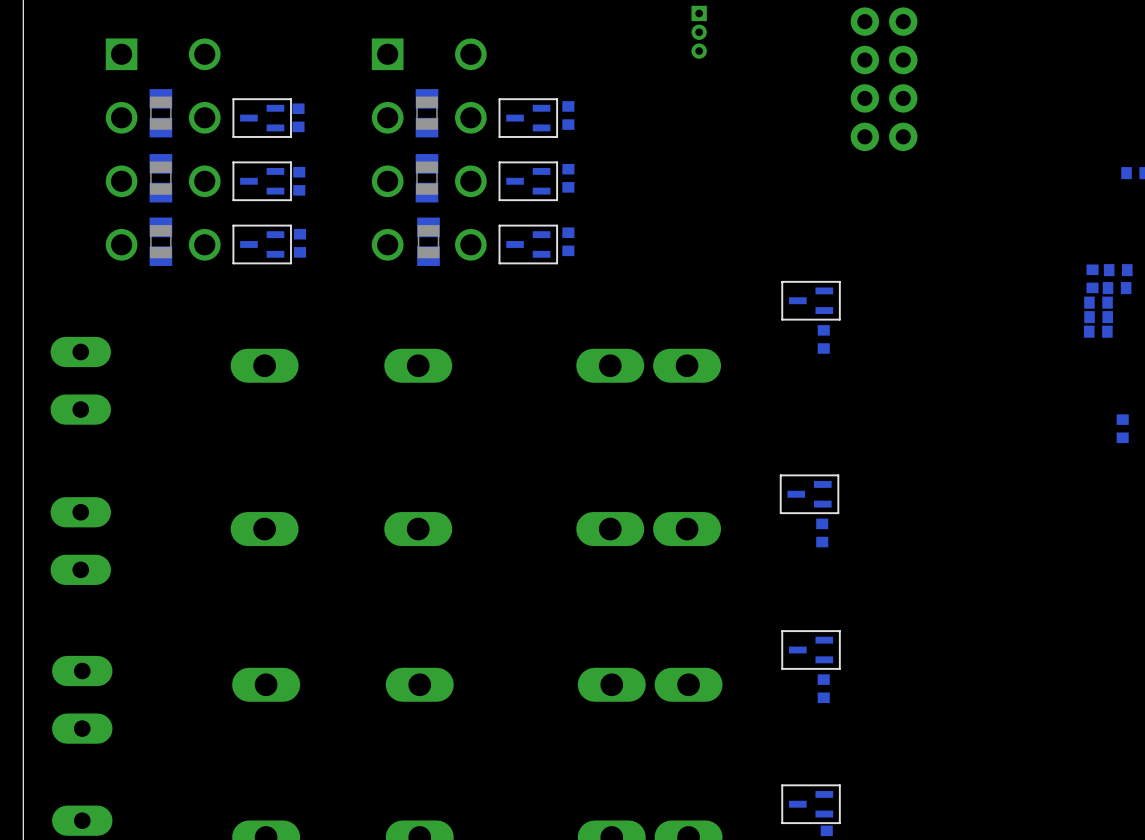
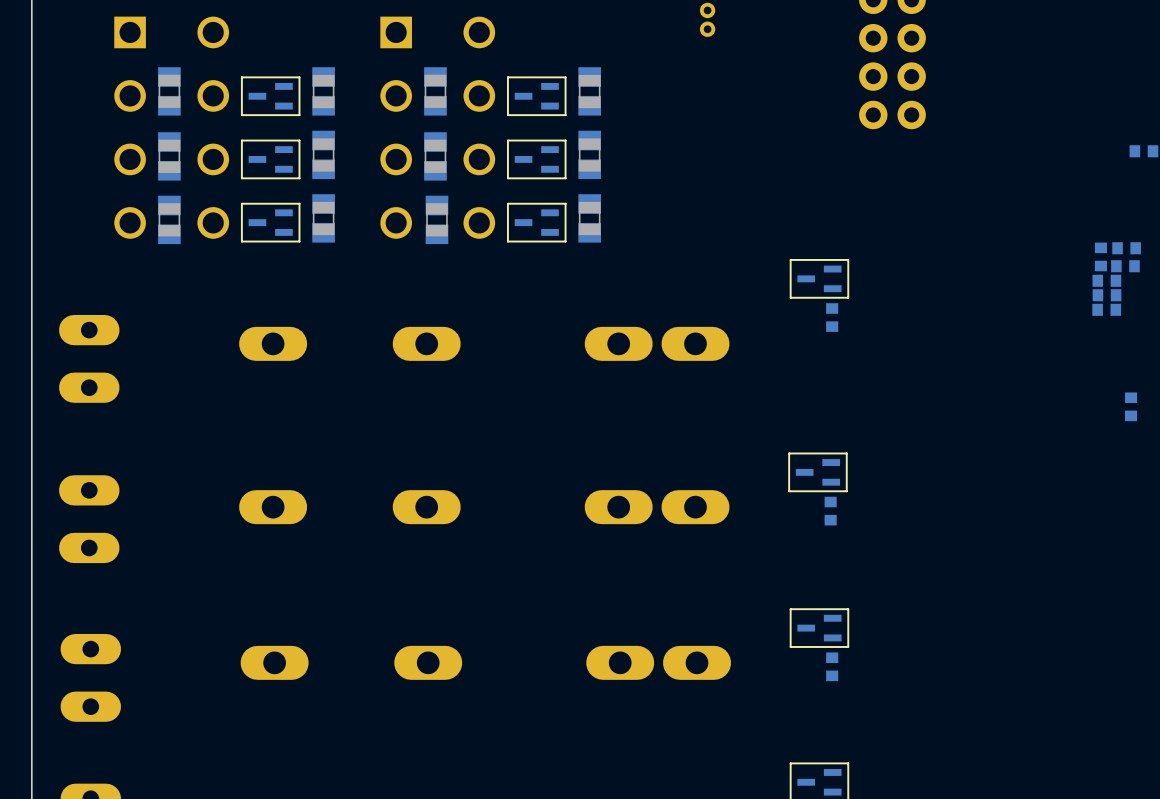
part footprint: [562, 101, 575, 130] -> [578, 67, 602, 116]
part: none -> (323, 91)
part: (298, 117) -> none
part footprint: [562, 163, 575, 193] -> [578, 130, 602, 180]
part: none -> (323, 154)
part: (299, 181) -> none
part footprint: [562, 227, 575, 257] -> [578, 194, 602, 243]
part: none -> (323, 218)
part: (300, 243) -> none

